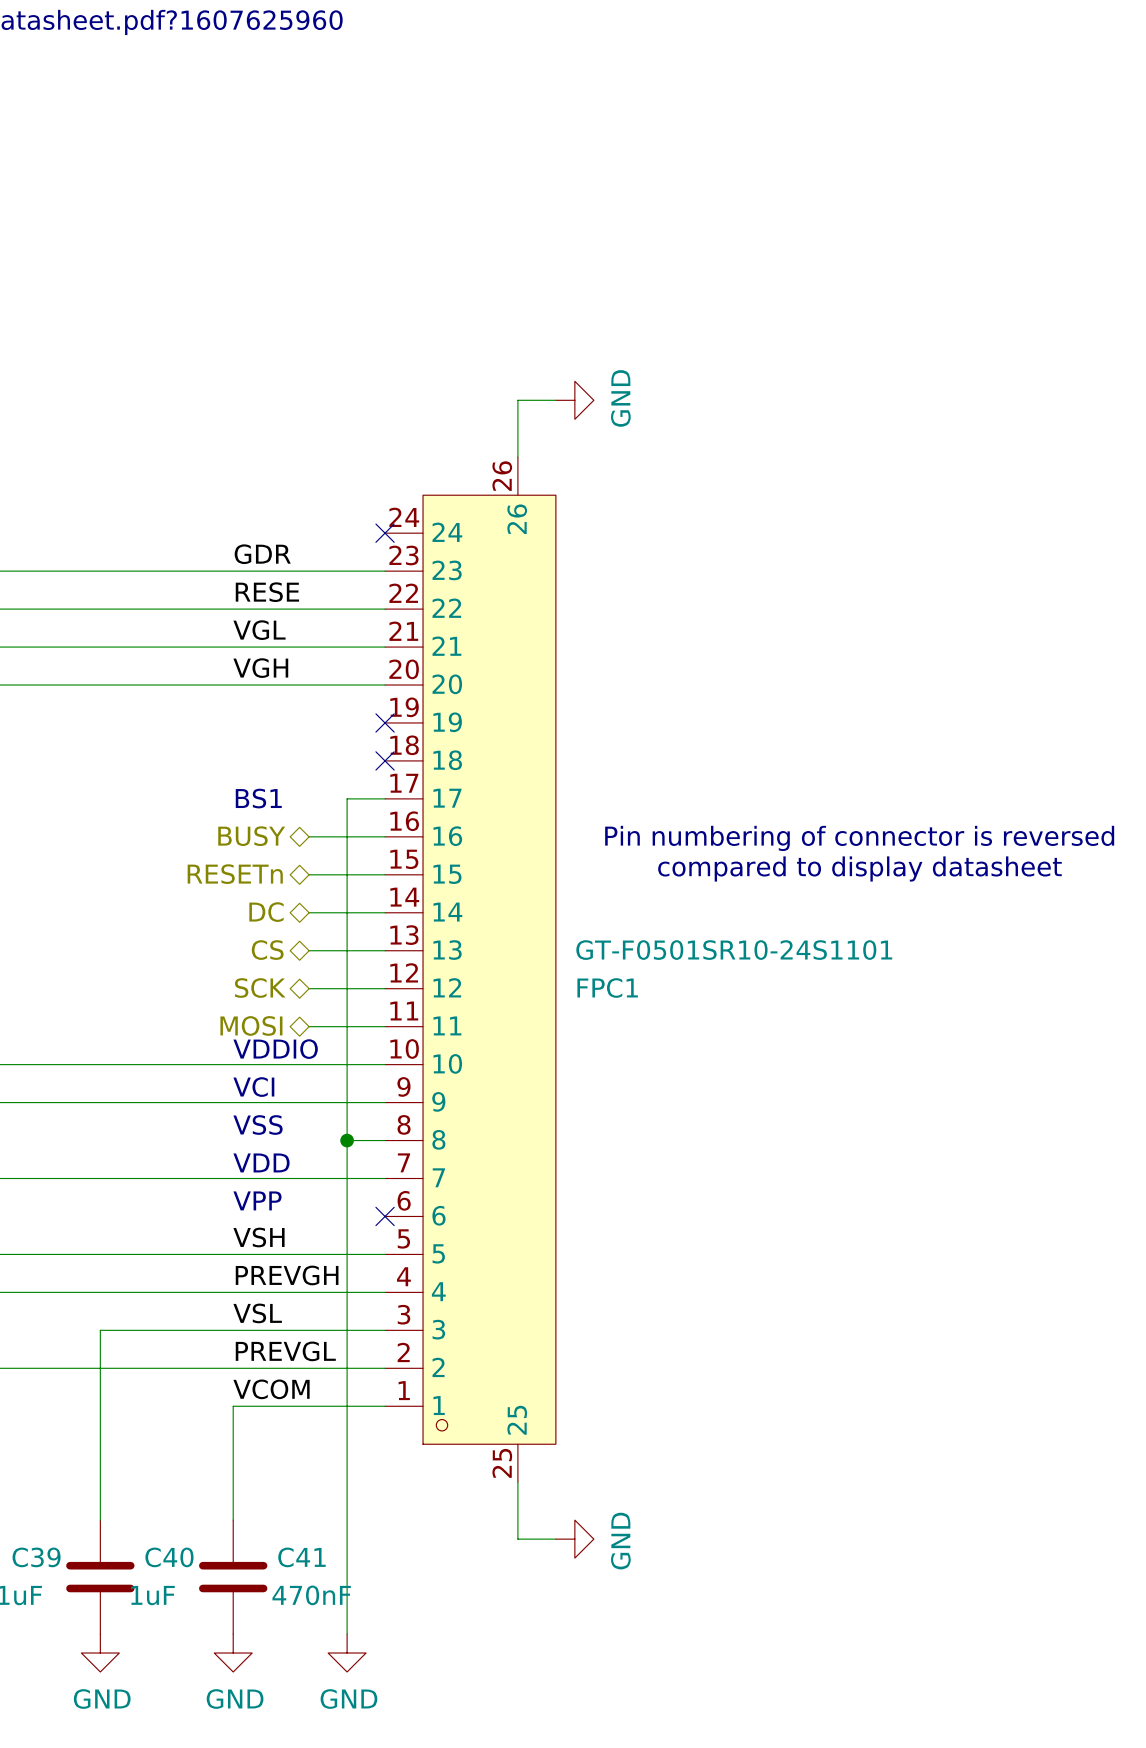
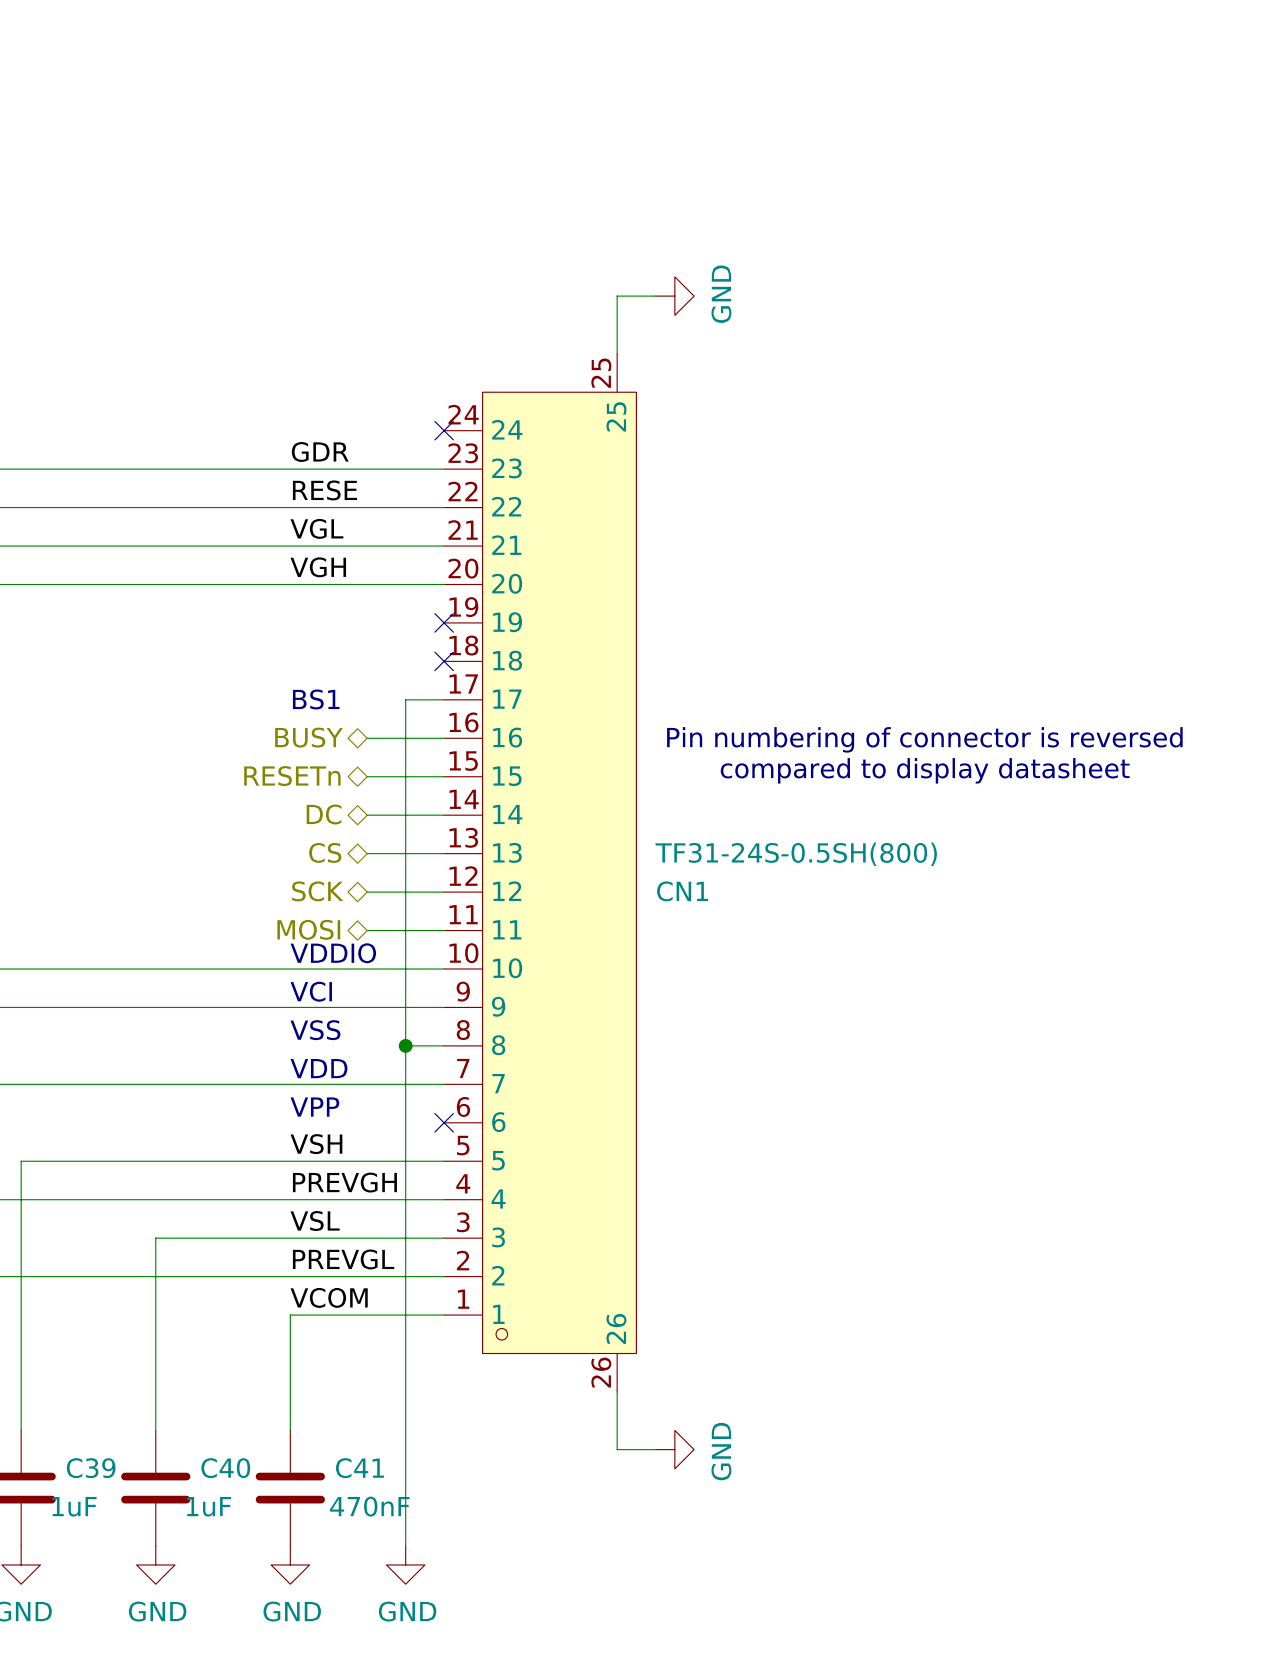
wire: (555, 400) (517, 400) (517, 457) -> (655, 296) (617, 296) (617, 353)
power symbol position: GND (574, 400) -> GND (674, 296)
FPC1: GT-F0501SR10-24S1101 (470, 969) -> none
CN1: none -> TF31-24S-0.5SH(800) (540, 872)
wire: (517, 1482) (517, 1539) (555, 1539) -> (617, 1391) (617, 1449) (655, 1449)
power symbol position: GND (574, 1539) -> GND (674, 1449)

